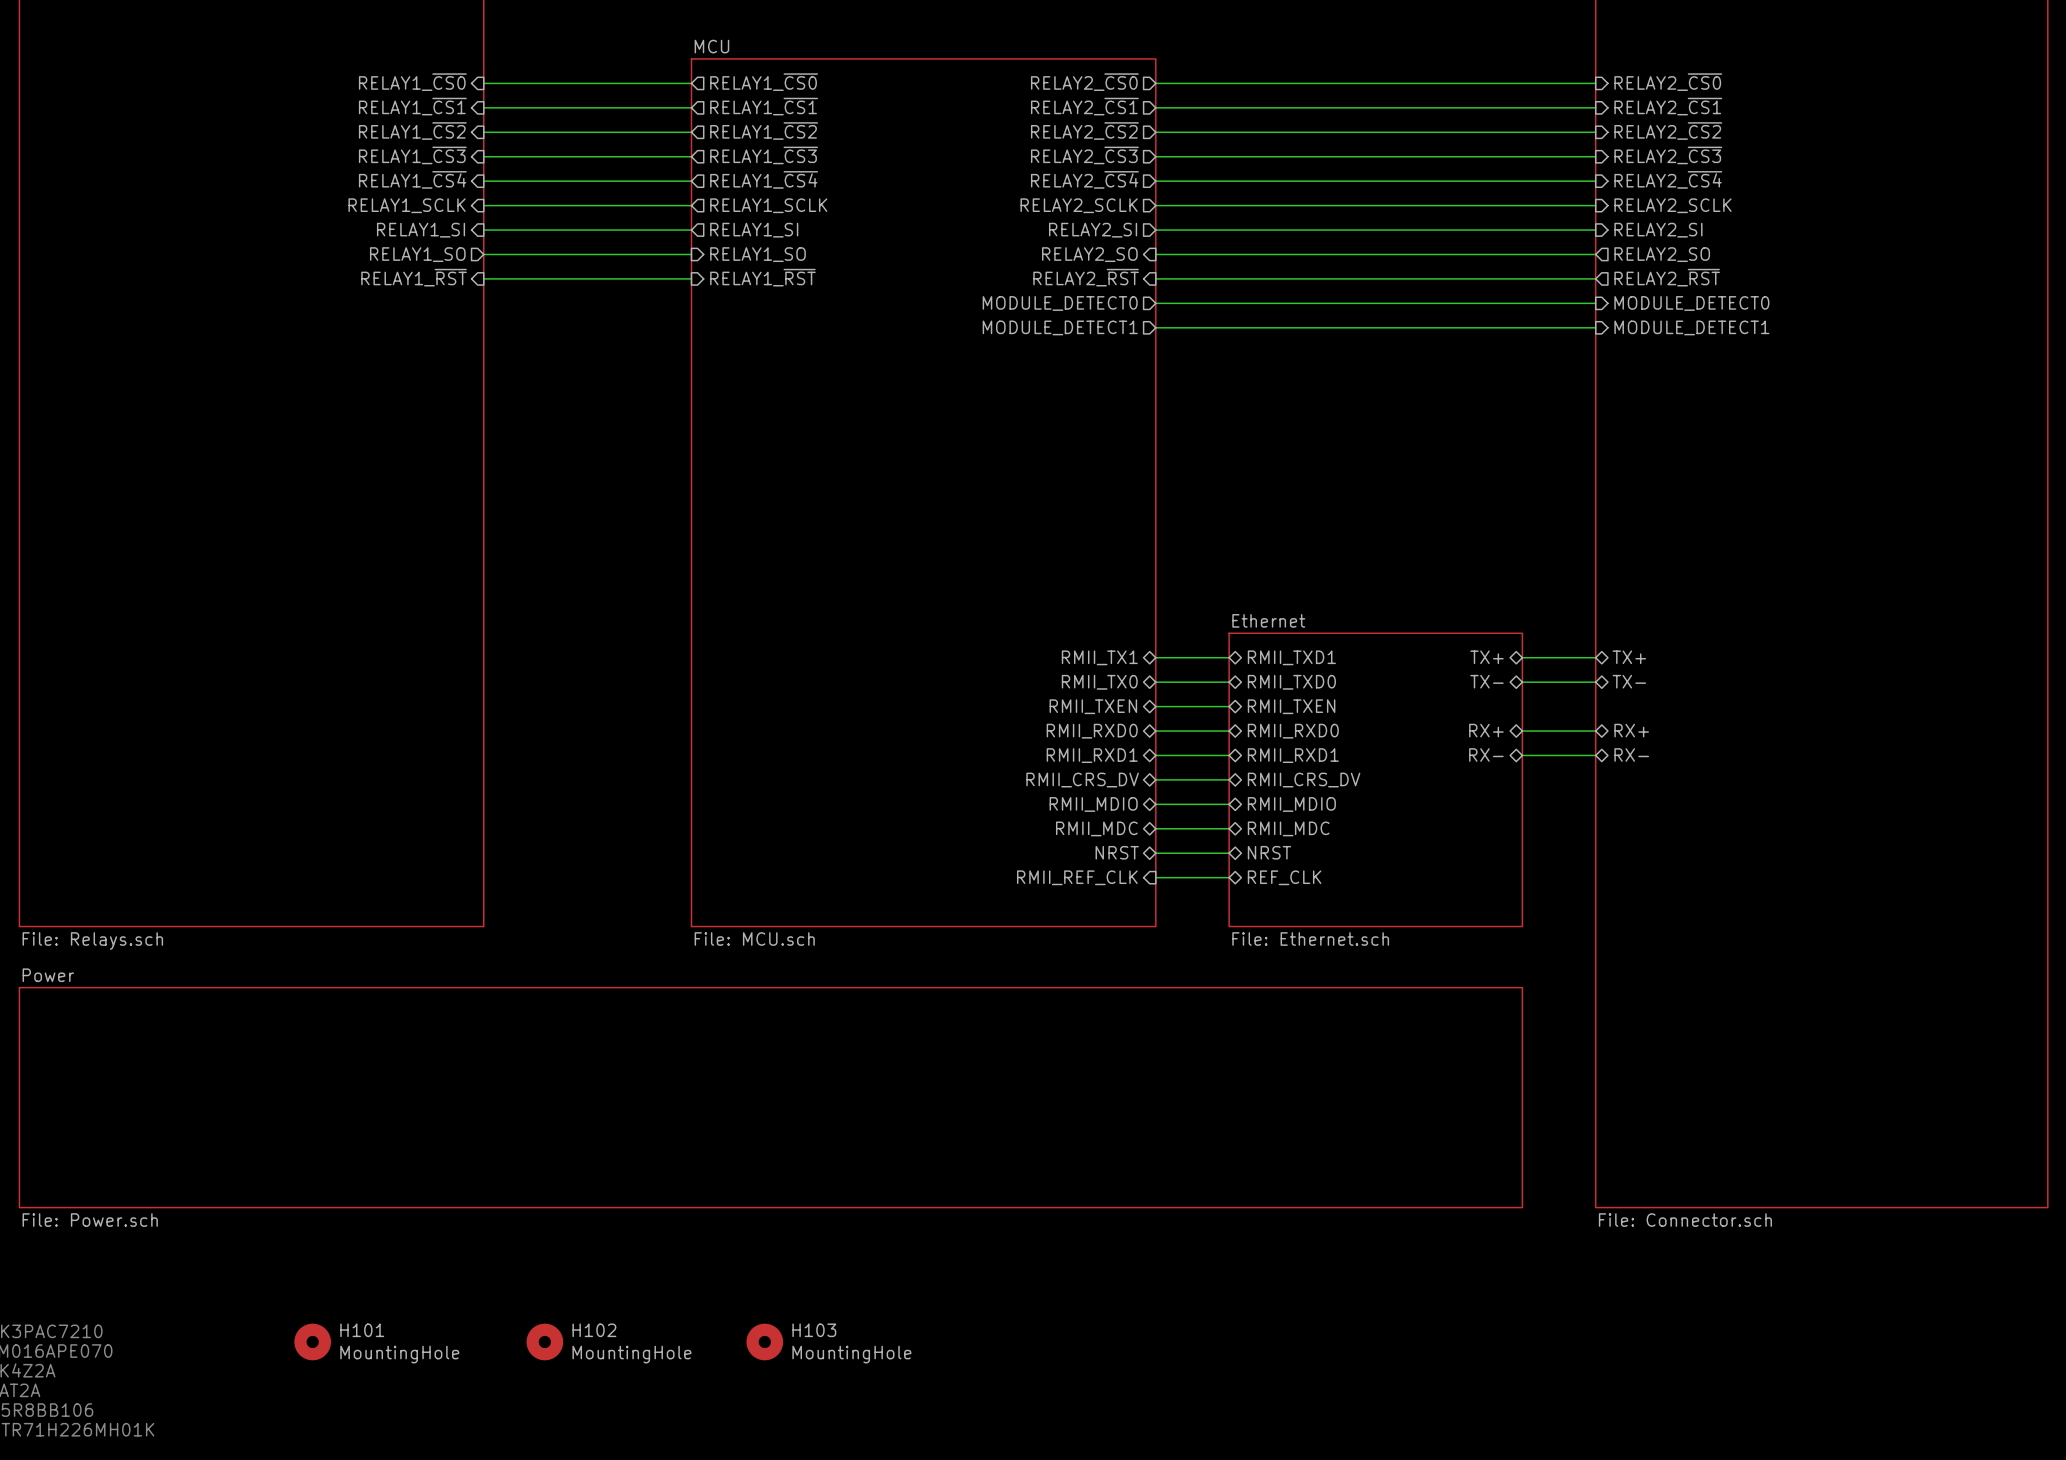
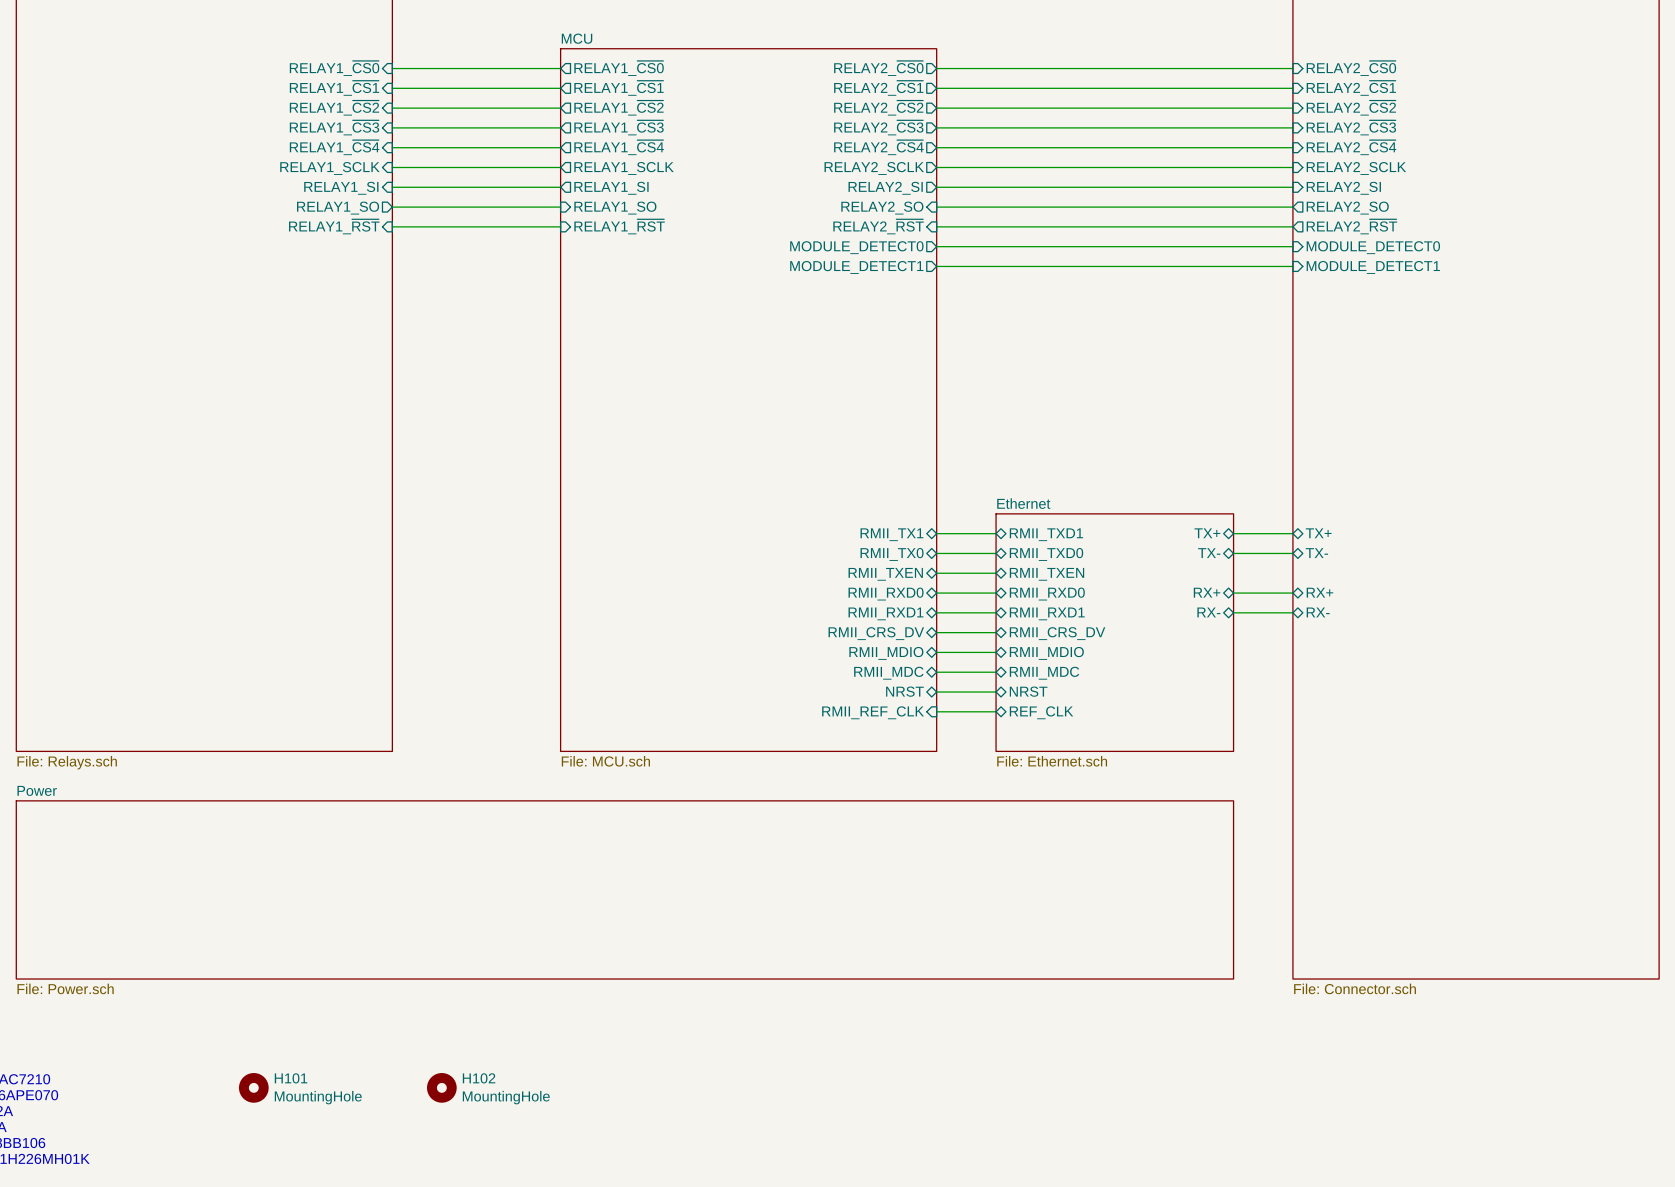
H103: MountingHole (764, 1341) -> none

